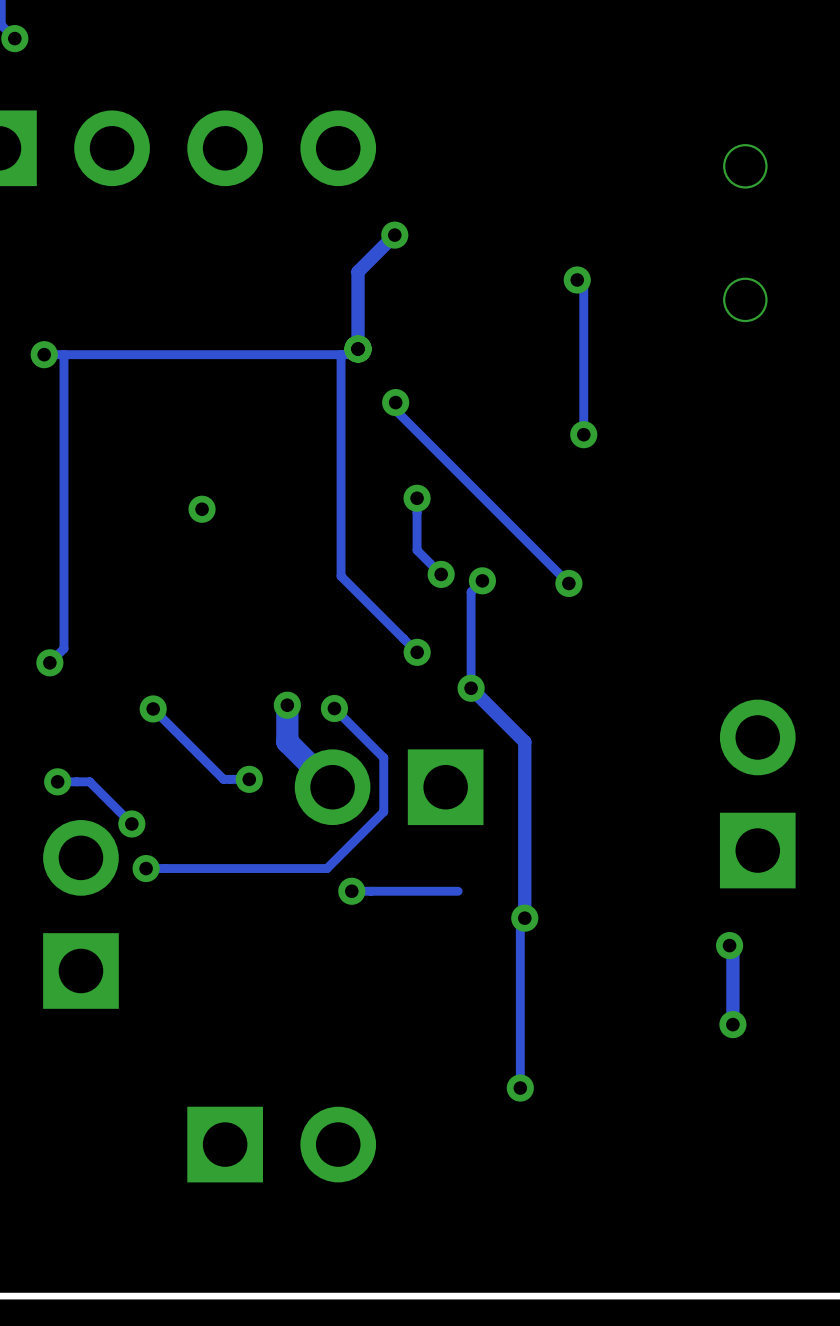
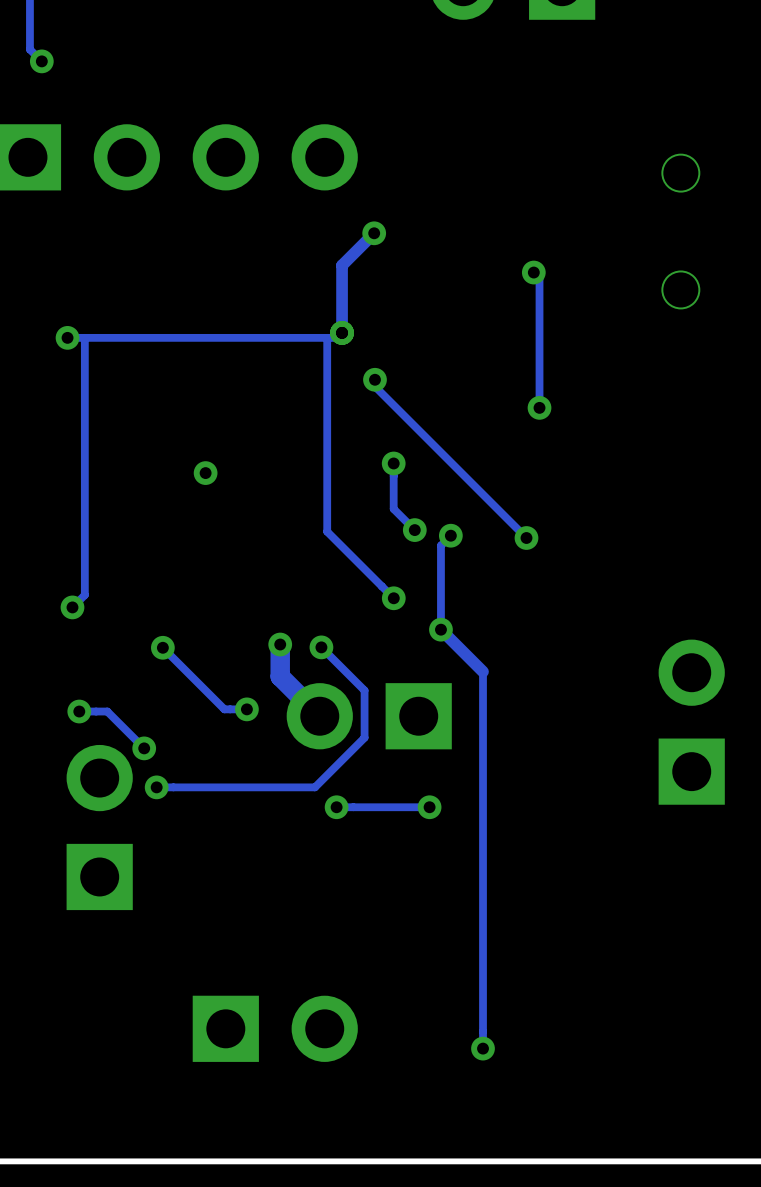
track: (519, 736) (524, 741) (524, 918) (520, 922) (520, 1088) -> (483, 671) (483, 1048)
via position: (524, 918) -> (429, 807)
track: (729, 945) (732, 948) (732, 1024) -> none
via: (729, 945) -> none
via: (732, 1024) -> none
via position: (520, 1088) -> (483, 1048)

